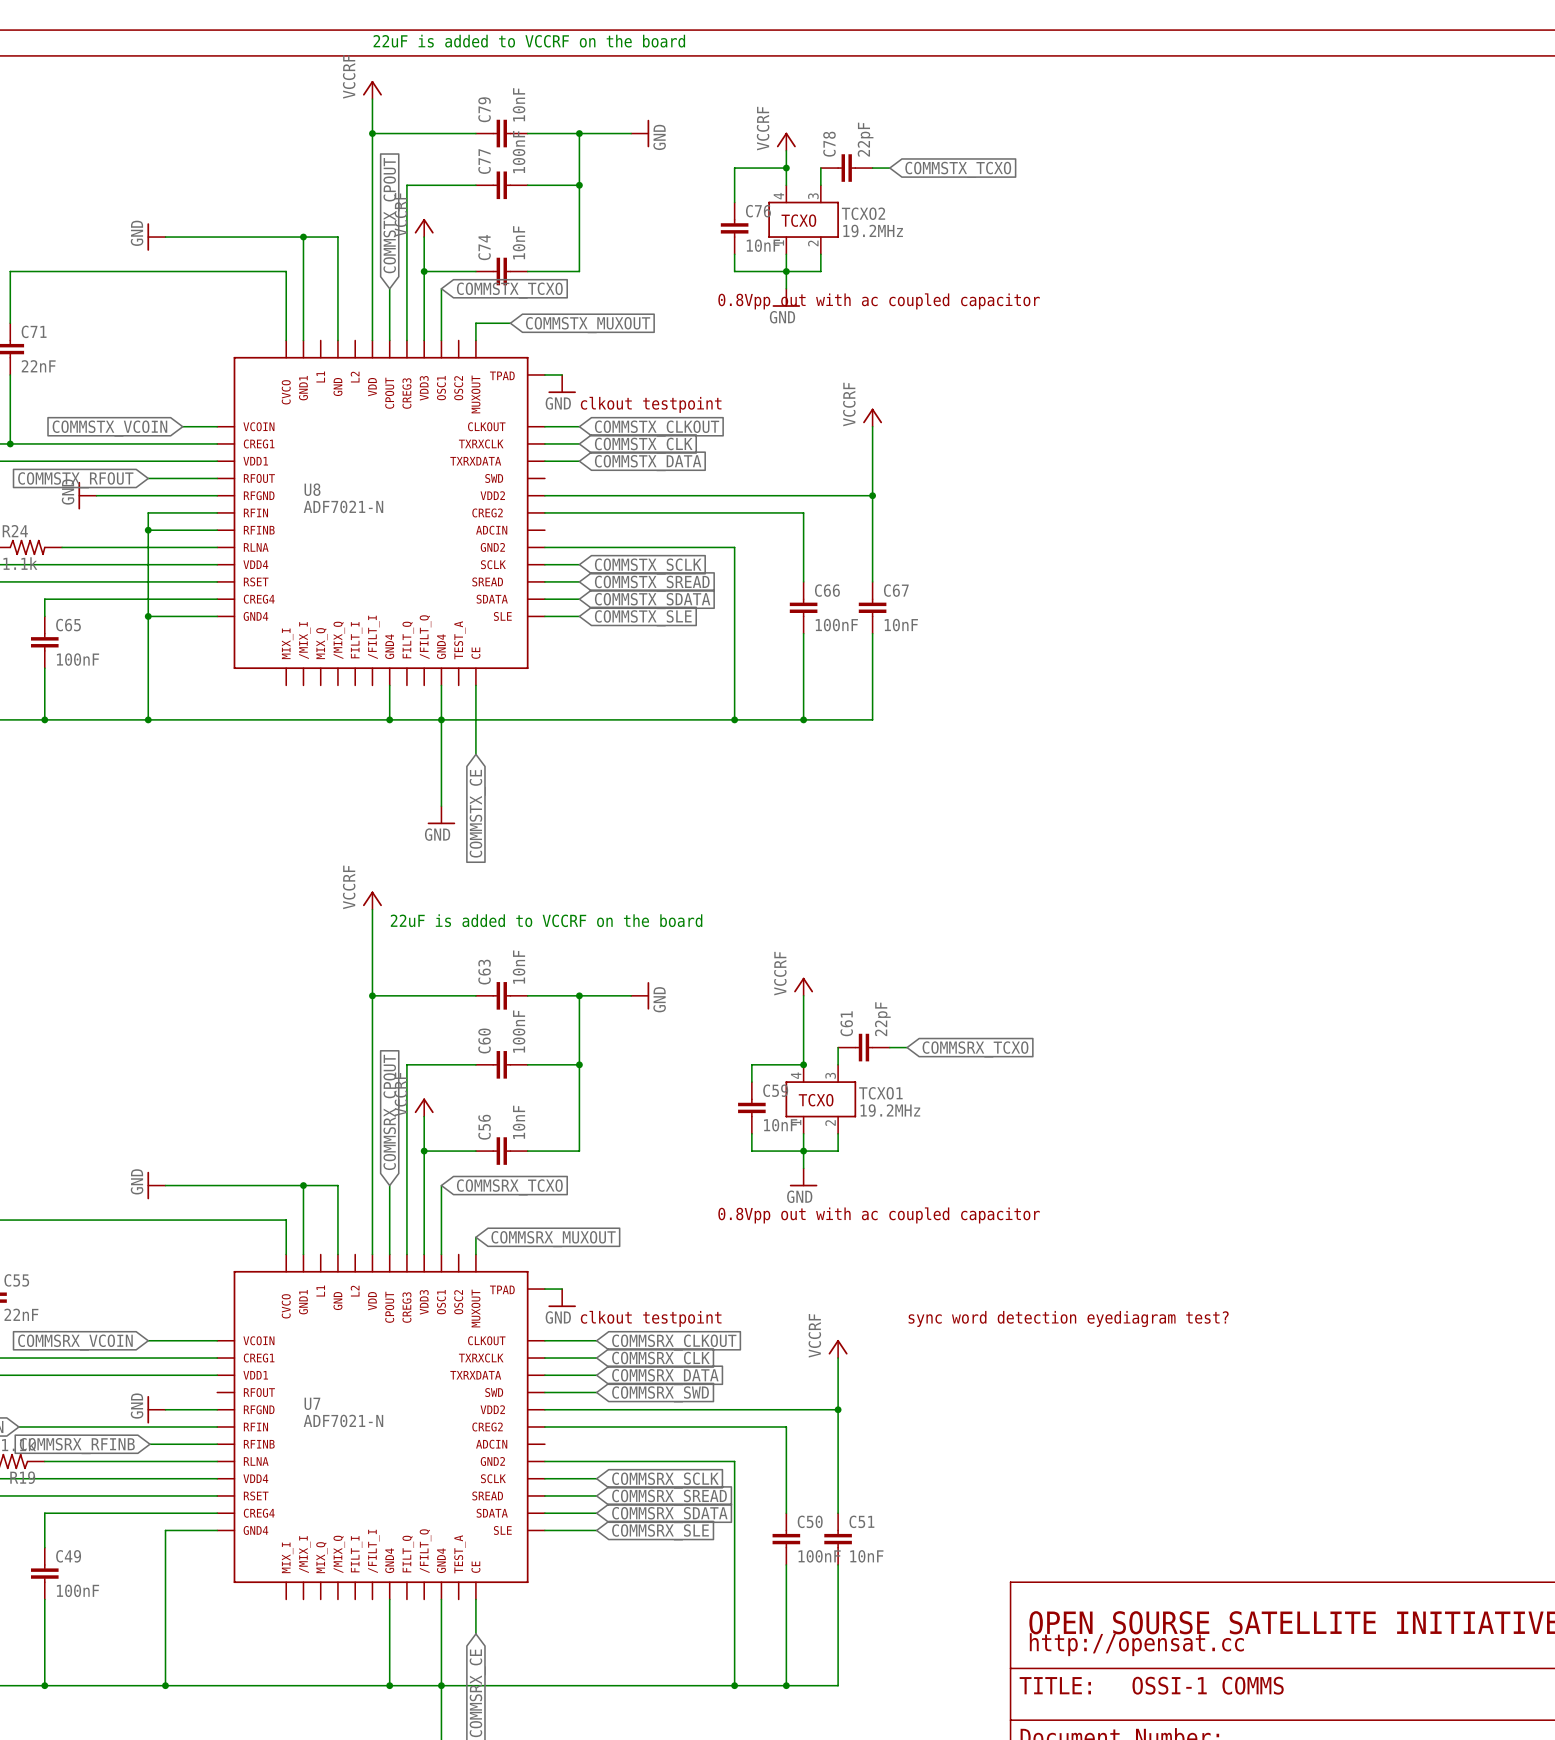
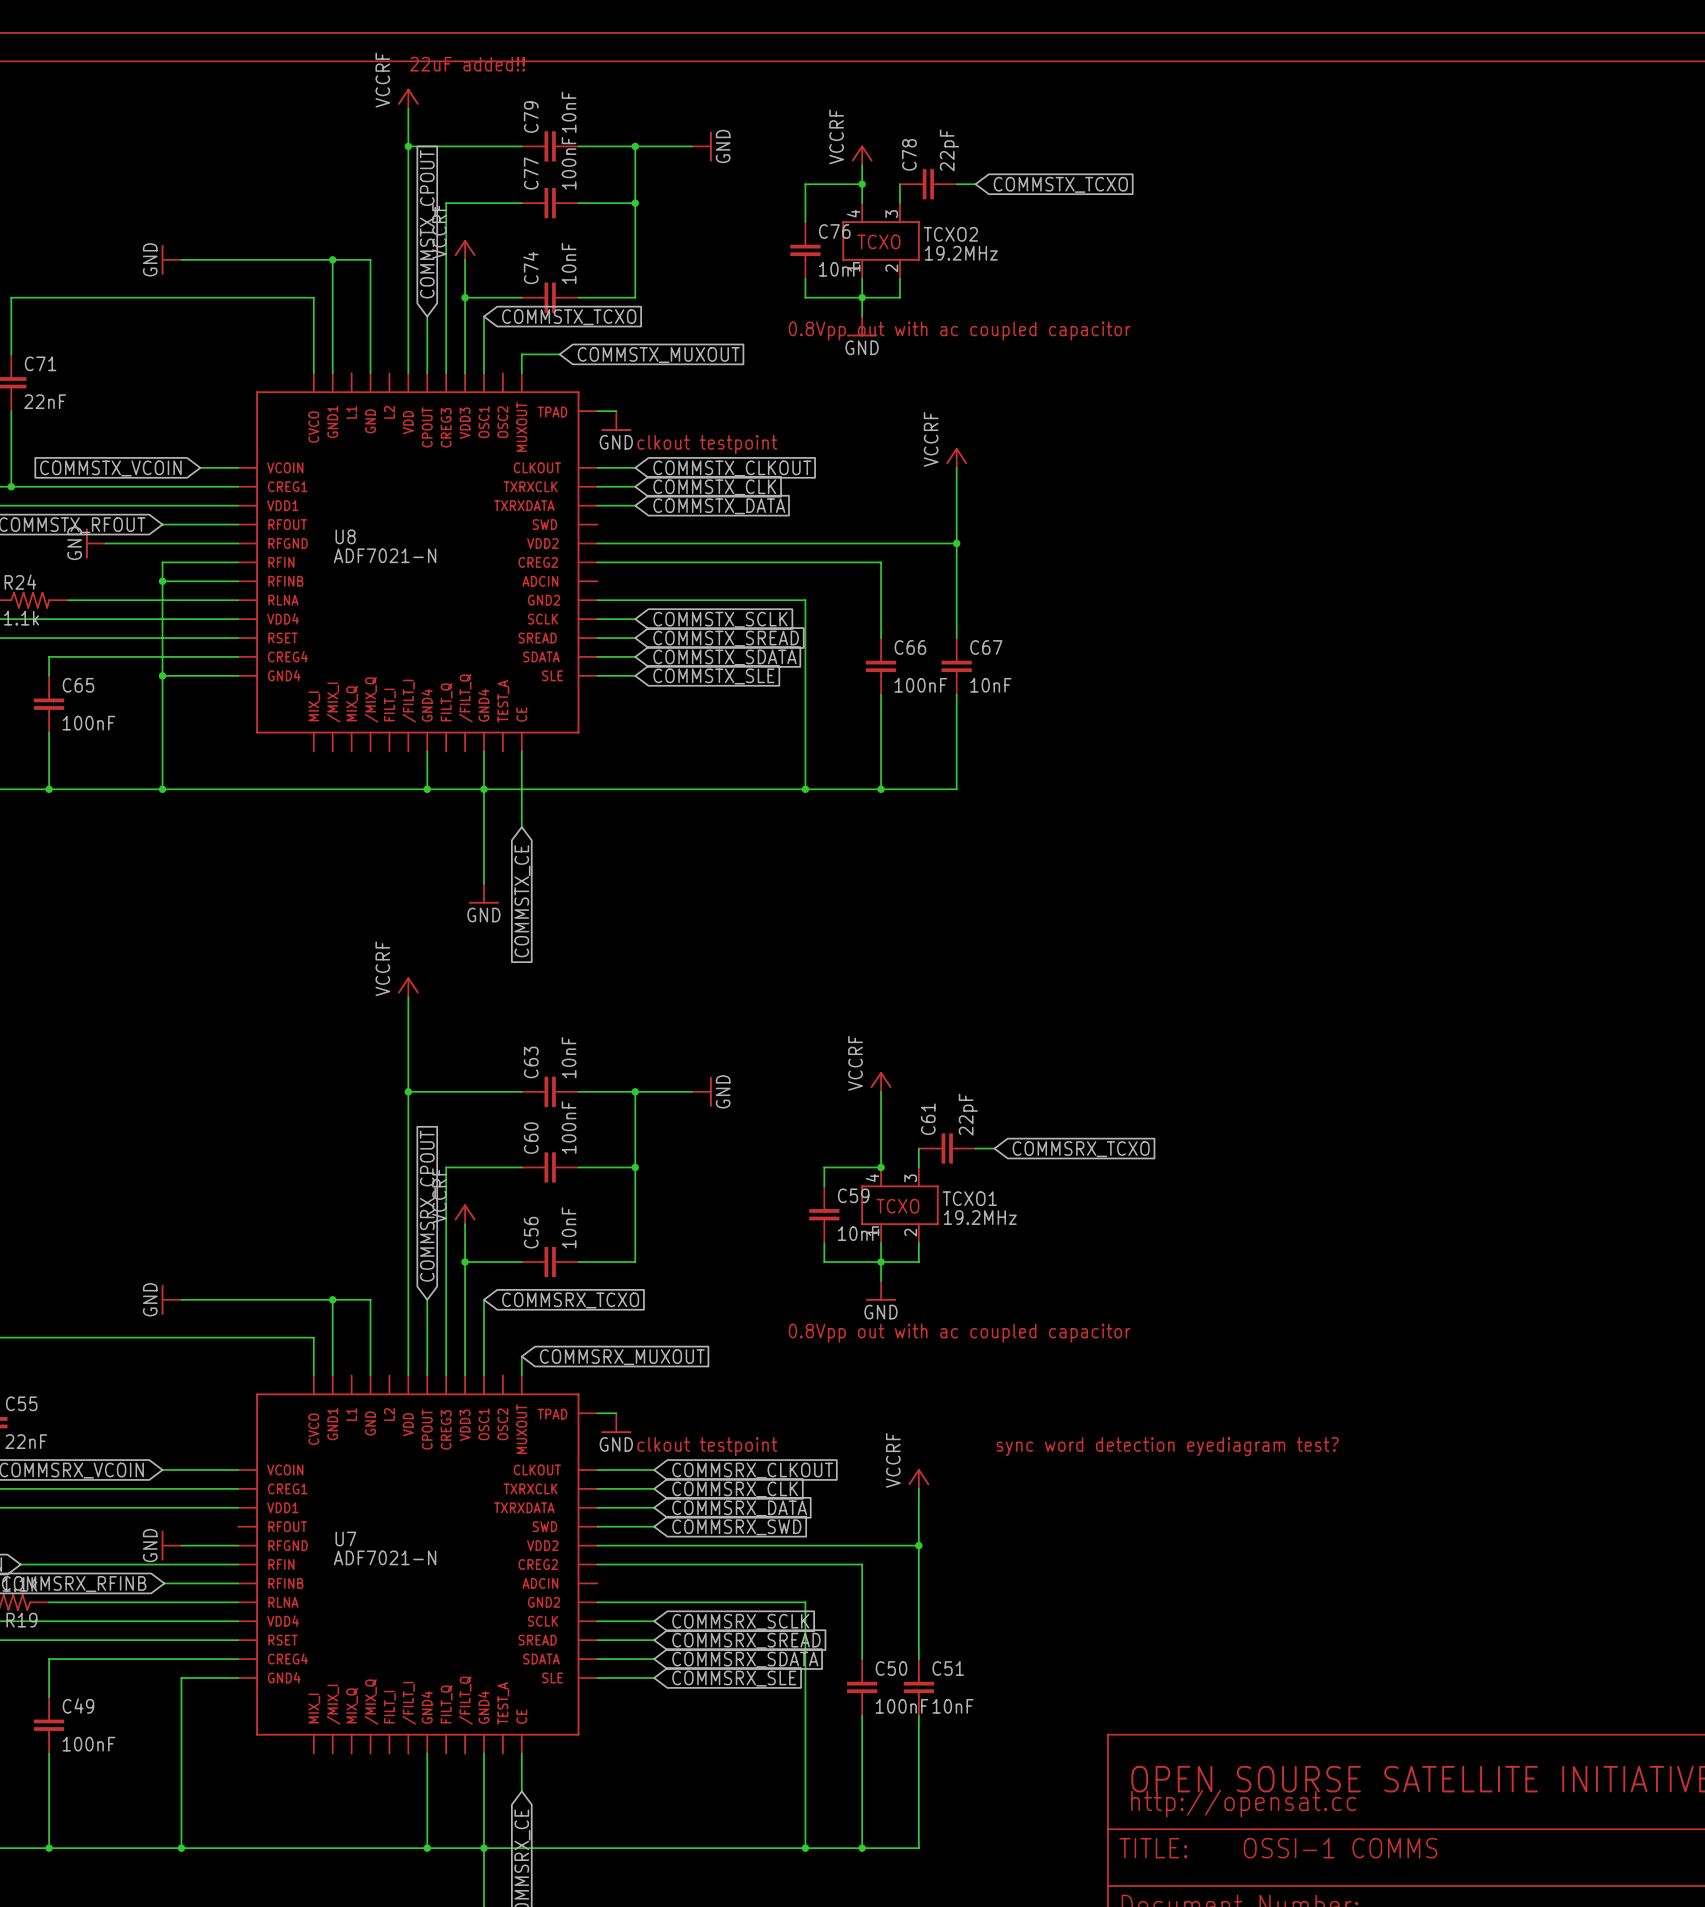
text: 22uF is added to VCCRF on the board (529, 41) -> none
text: none -> 22uF added!! (467, 64)
text: 22uF is added to VCCRF on the board (546, 920) -> none

